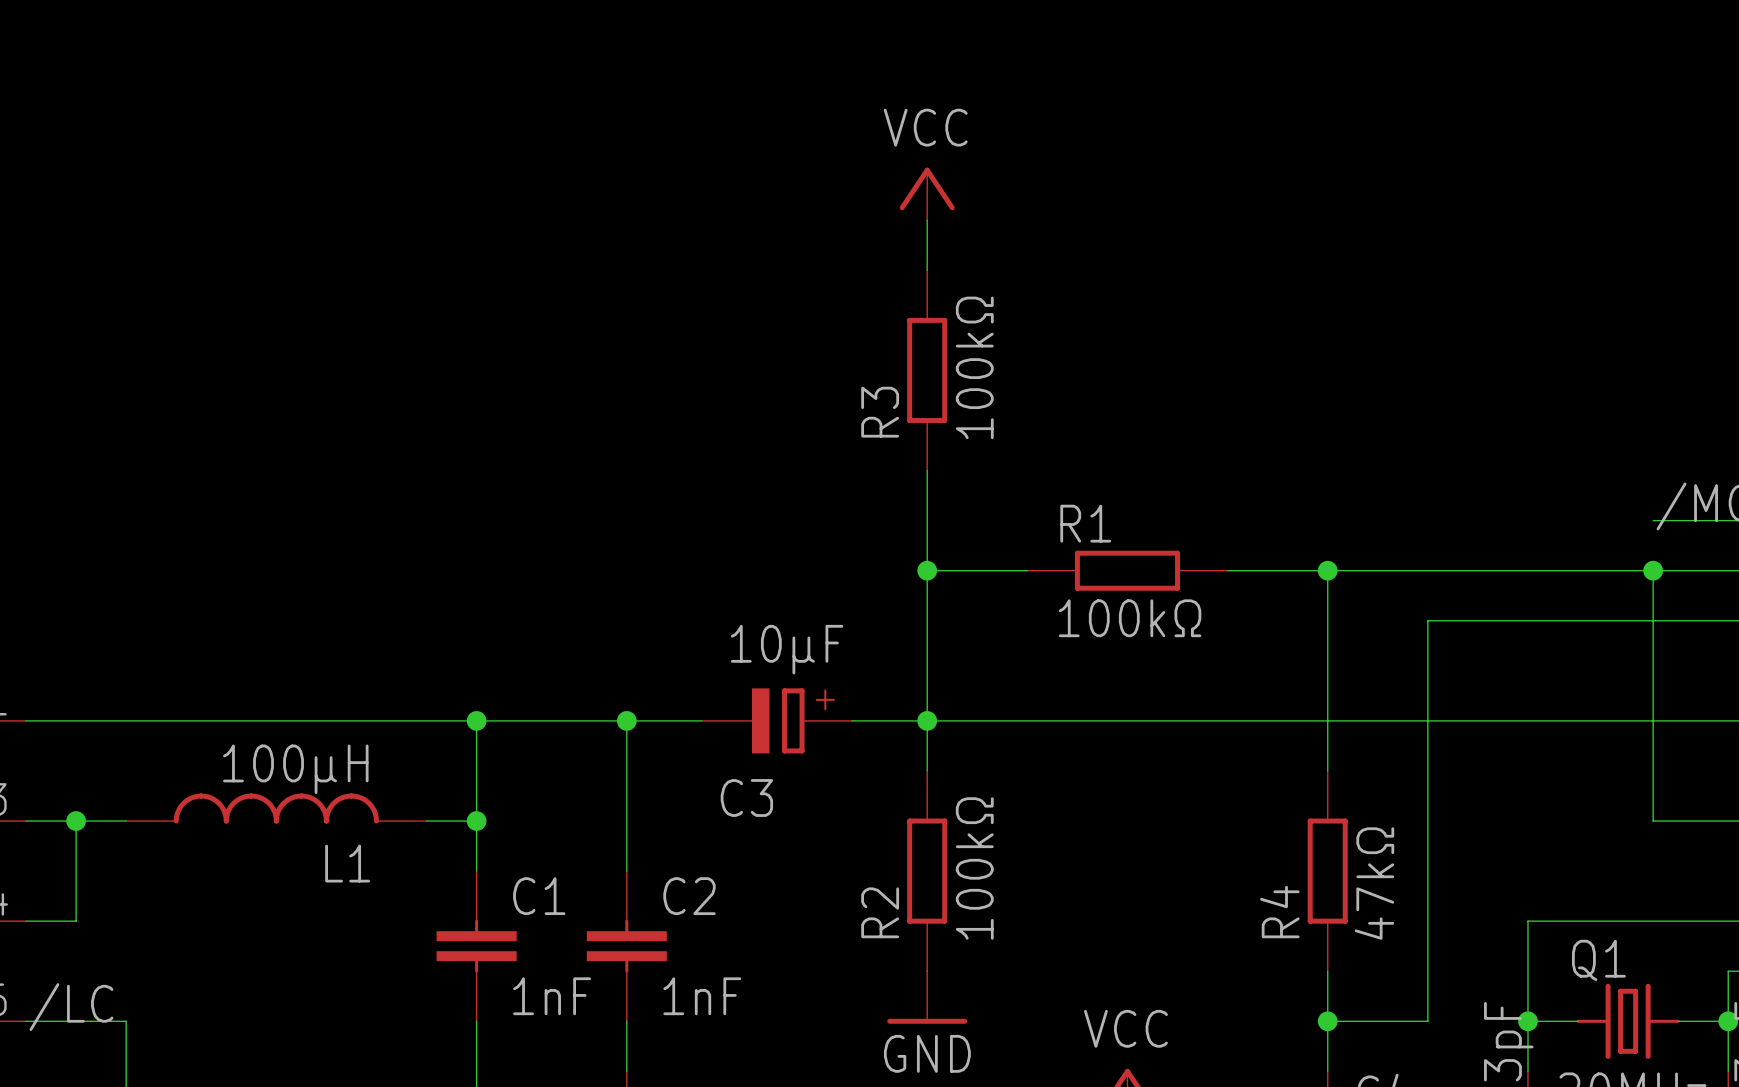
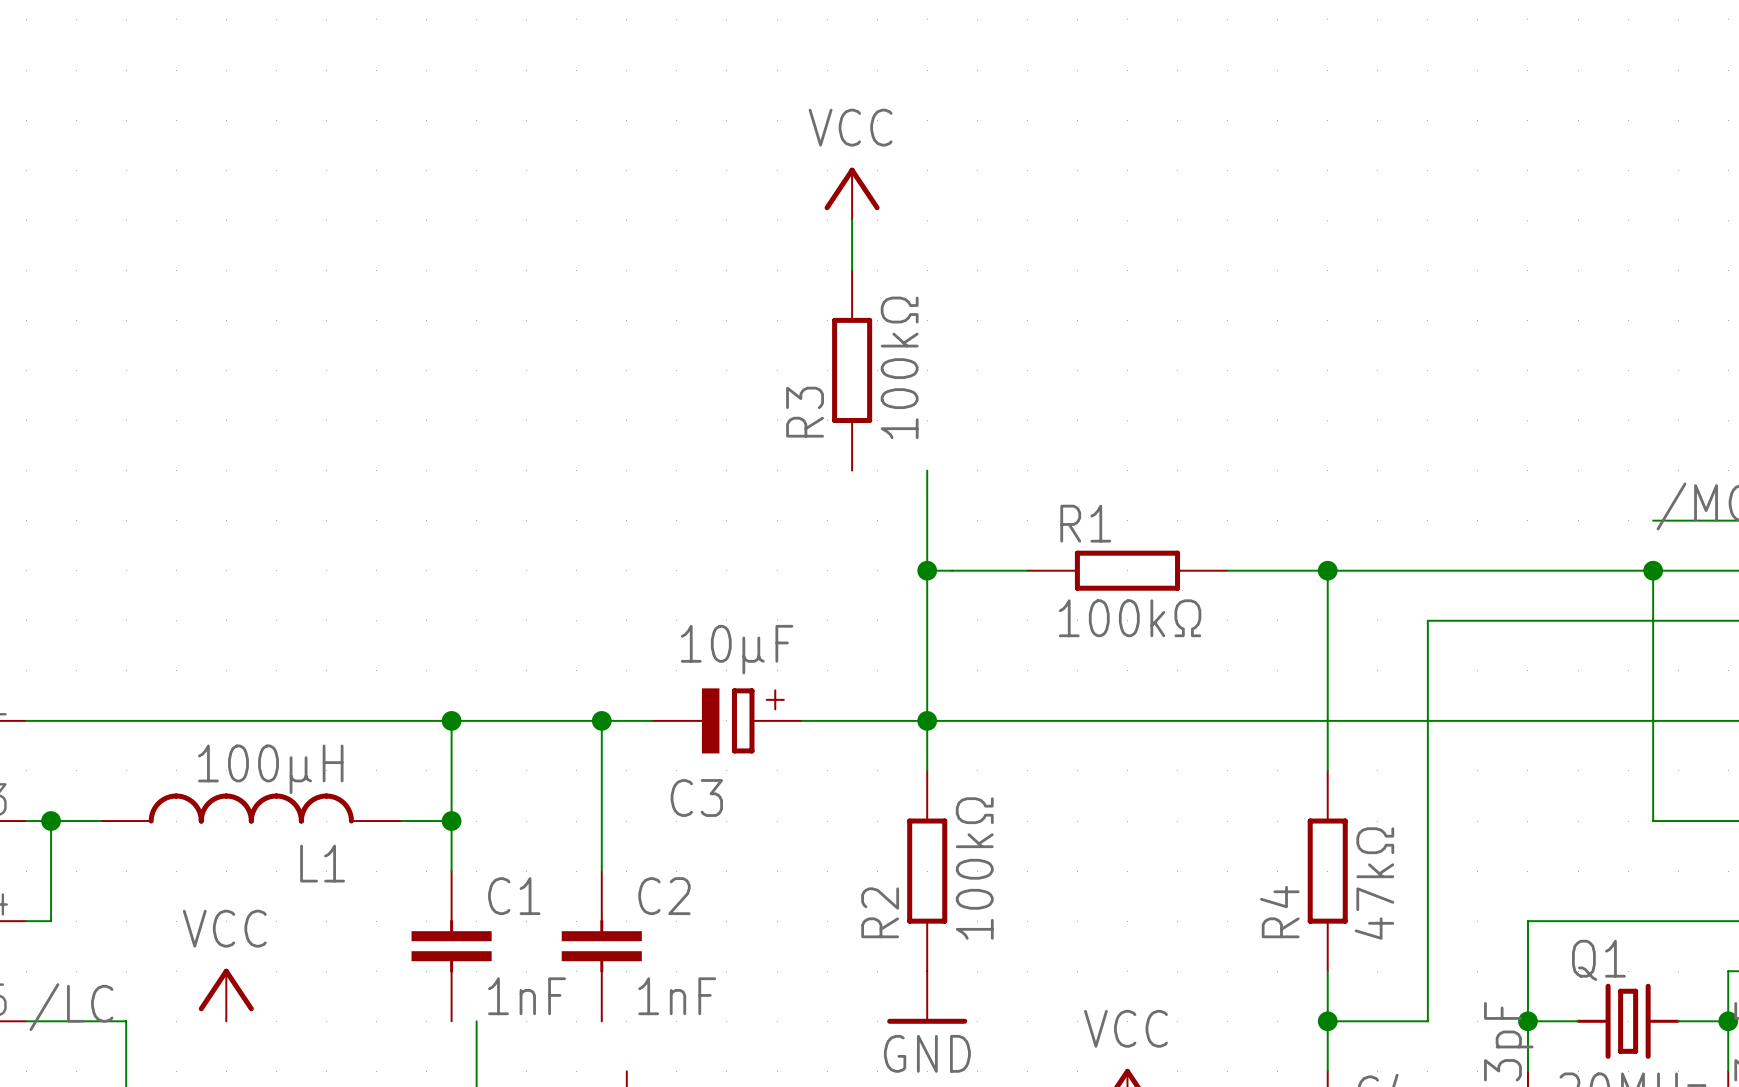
power symbol position: VCC (927, 193) -> VCC (852, 193)
wire: (927, 220) (927, 270) -> (852, 220) (852, 270)
R3 position: (927, 370) -> (852, 370)
wire: (476, 720) (476, 871) -> (451, 720) (451, 871)
junction position: (476, 720) -> (451, 720)
wire: (626, 720) (626, 871) -> (601, 720) (601, 871)
junction position: (626, 720) -> (601, 720)
C3 position: (777, 720) -> (726, 720)
L1 position: (276, 808) -> (251, 808)
wire: (76, 821) (76, 921) (51, 921) -> (51, 821) (51, 921)
junction position: (76, 821) -> (51, 821)
junction position: (476, 821) -> (451, 821)
C1 position: (476, 946) -> (451, 946)
C2 position: (626, 946) -> (601, 946)
power symbol: none -> VCC (226, 995)
wire: (626, 1021) (626, 1071) -> none

